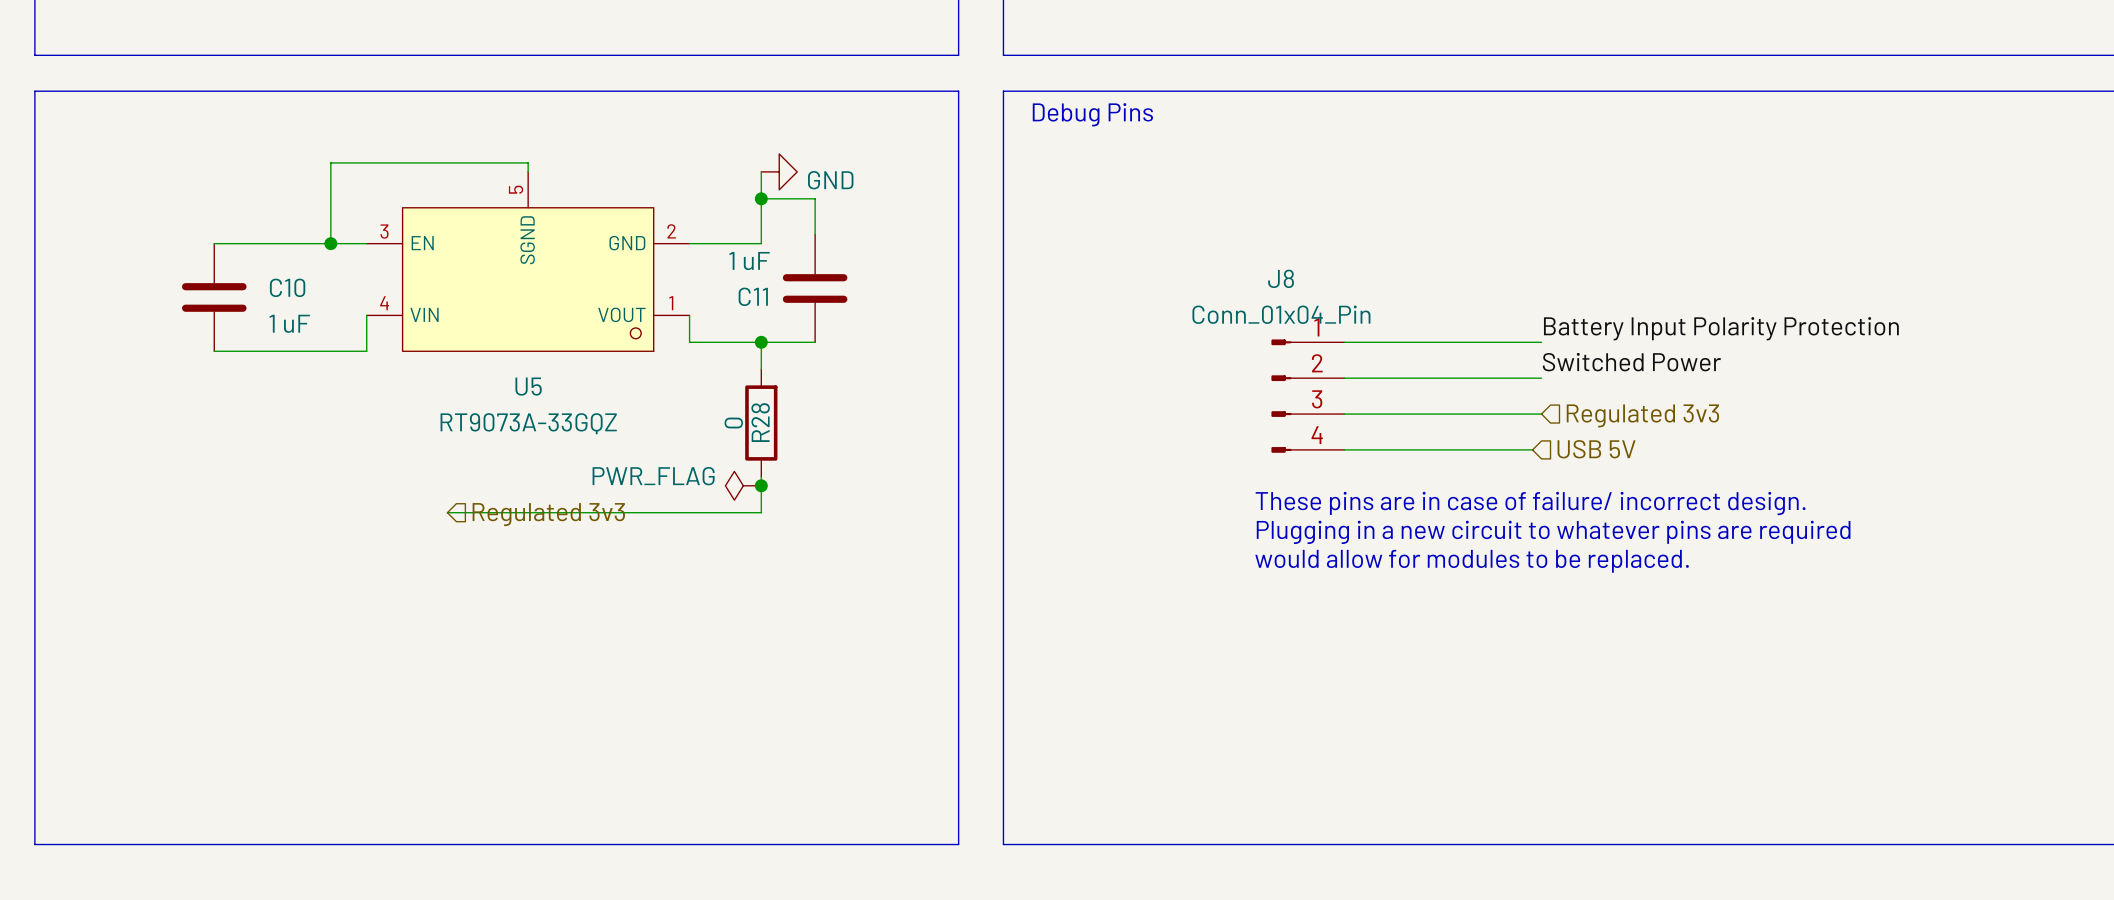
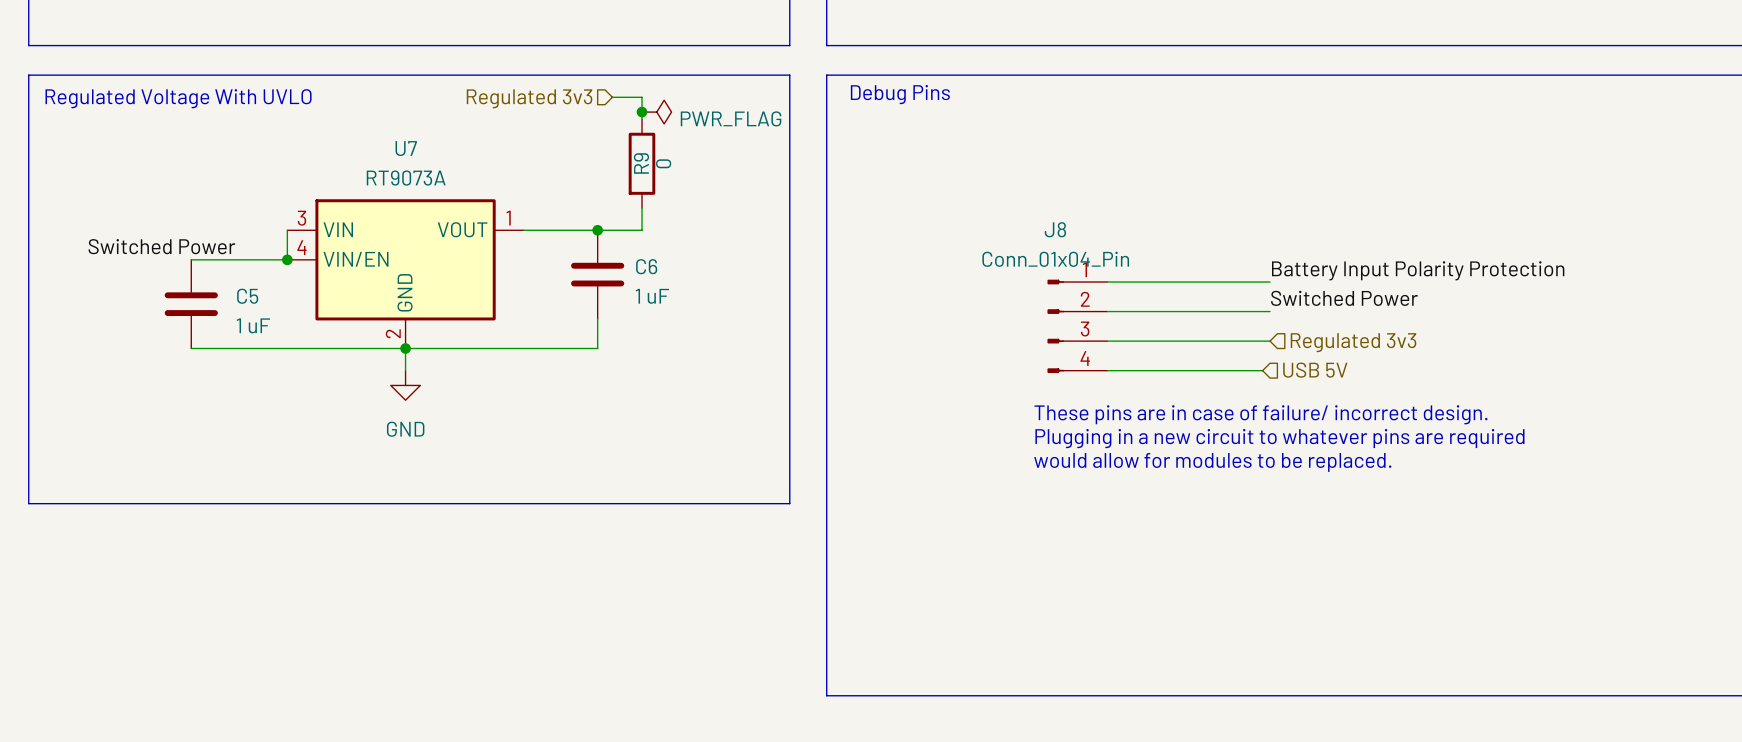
wire: none -> (612, 97) (641, 97) (641, 119)
text: none -> Regulated Voltage With UVLO (178, 98)
hierarchical label: none -> Regulated 3v3 (529, 98)
junction: none -> (641, 112)
power symbol: none -> PWR_FLAG (656, 112)
wire: (528, 171) (528, 162) (330, 162) (330, 243) -> none
wire: (761, 171) (761, 243) (689, 243) -> none
power symbol: GND (779, 171) -> none
wire: (761, 198) (815, 198) (815, 234) -> none
junction: (761, 198) -> none
R9: none -> 0 (641, 163)
wire: (214, 243) (366, 243) -> none
junction position: (330, 243) -> (287, 259)
wire: none -> (641, 208) (641, 230) (523, 230)
U5: RT9073A-33GQZ (528, 261) -> none
wire: none -> (287, 230) (287, 259) (191, 259)
junction: none -> (597, 230)
C11: 1 uF (815, 288) -> none
C10: 1 uF (214, 297) -> none
label: none -> Switched Power (161, 246)
wire: (366, 315) (366, 351) (214, 351) -> none
wire: (689, 315) (689, 342) (815, 342) -> none
U7: none -> RT9073A (405, 273)
C6: none -> 1 uF (597, 274)
wire: (761, 342) (761, 369) -> (405, 348) (405, 370)
junction: (761, 342) -> none
C5: none -> 1 uF (191, 304)
wire: none -> (597, 318) (597, 348) (191, 348)
junction: none -> (405, 348)
R28: 0 (761, 423) -> none
power symbol: none -> GND (405, 385)
wire: (761, 476) (761, 512) (447, 512) -> none
power symbol: PWR_FLAG (743, 485) -> none
junction: (761, 485) -> none
hierarchical label: Regulated 3v3 (548, 514) -> none
line: (34, 611) (34, 844) (958, 844) (958, 611) -> (28, 503) (789, 503)

